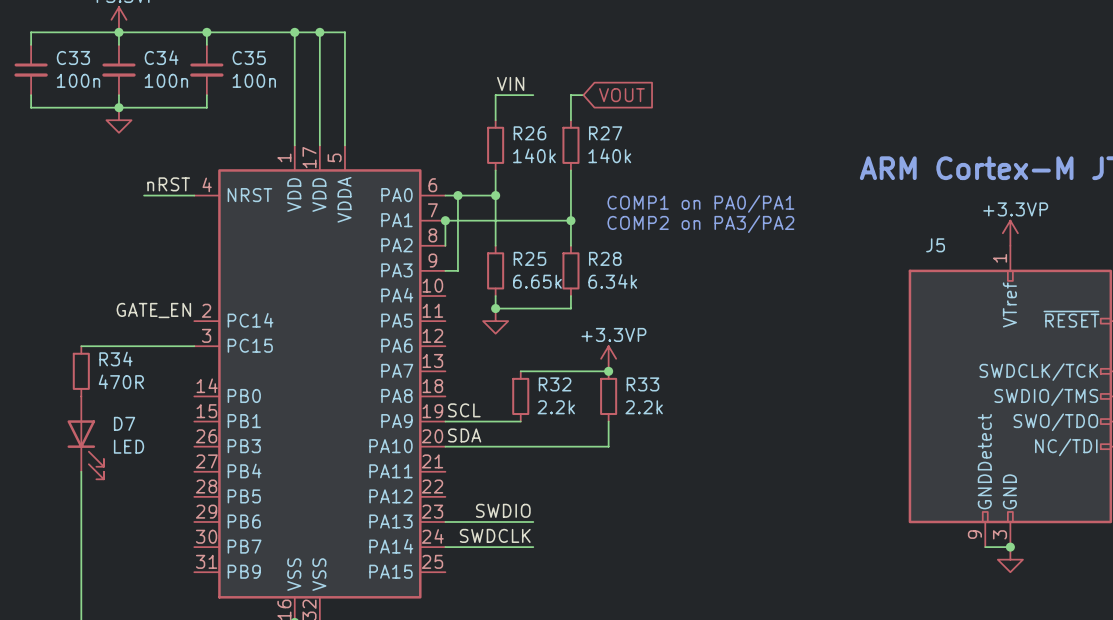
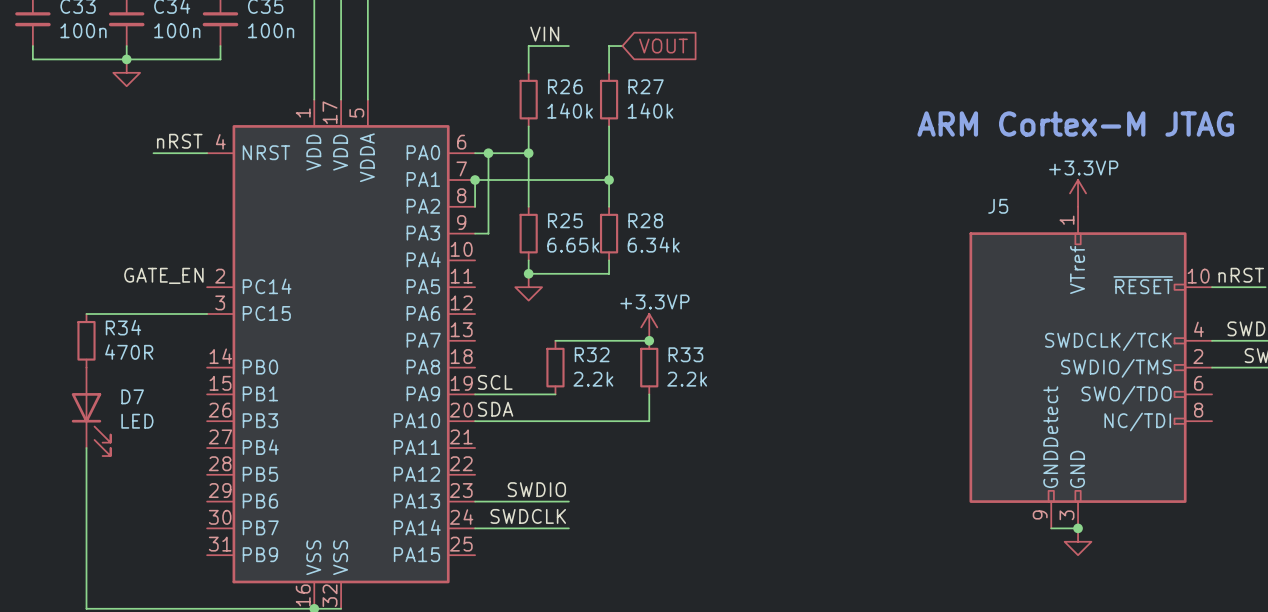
text: COMP1 on PA0/PA1 (700, 203) -> none
text: COMP2 on PA3/PA2 (700, 224) -> none

